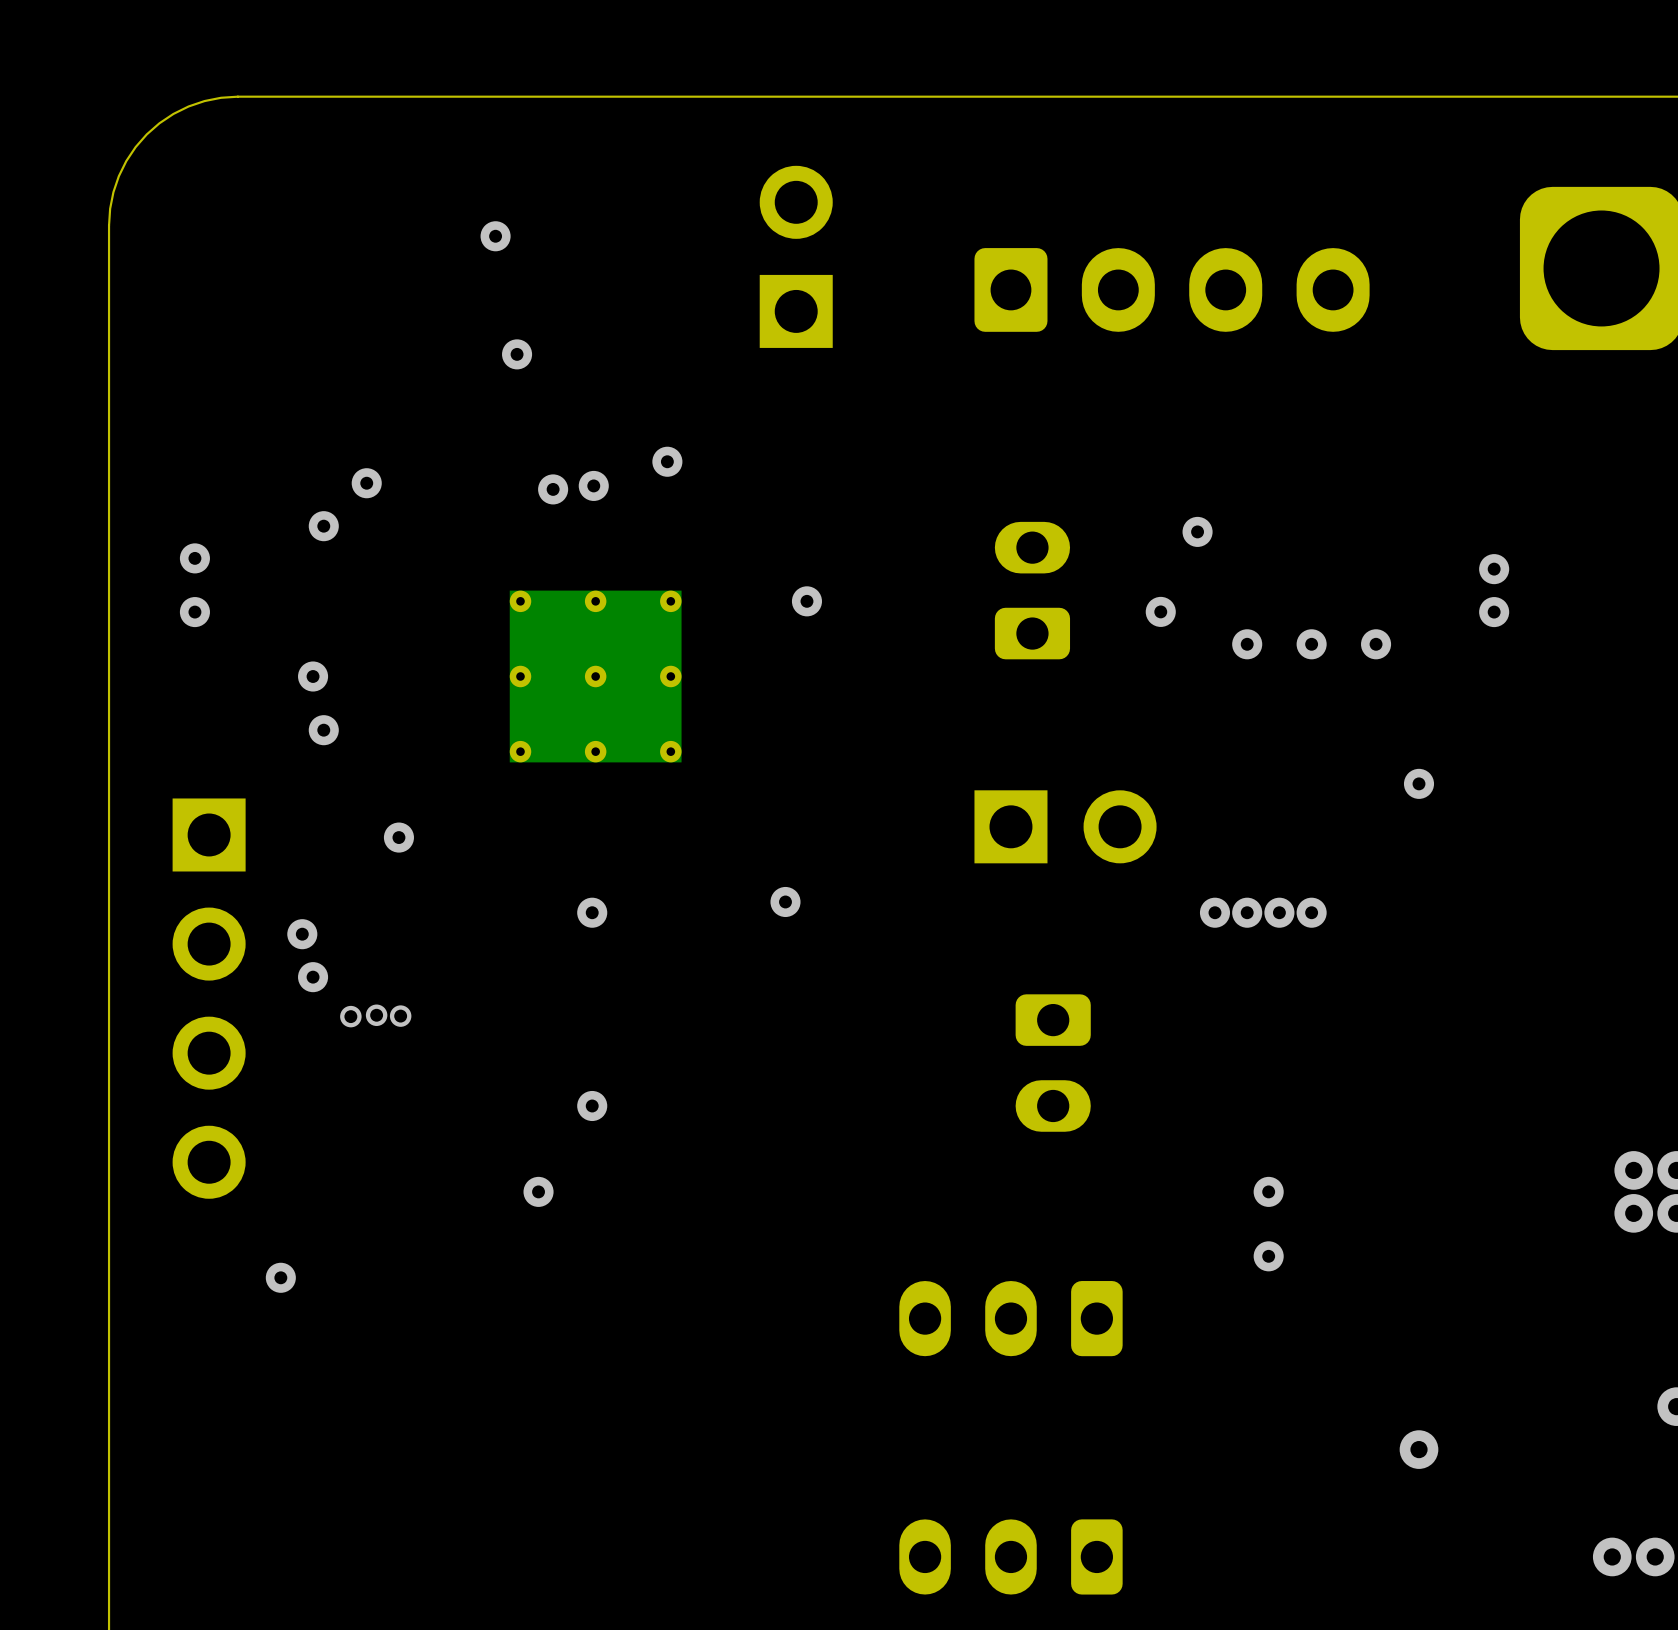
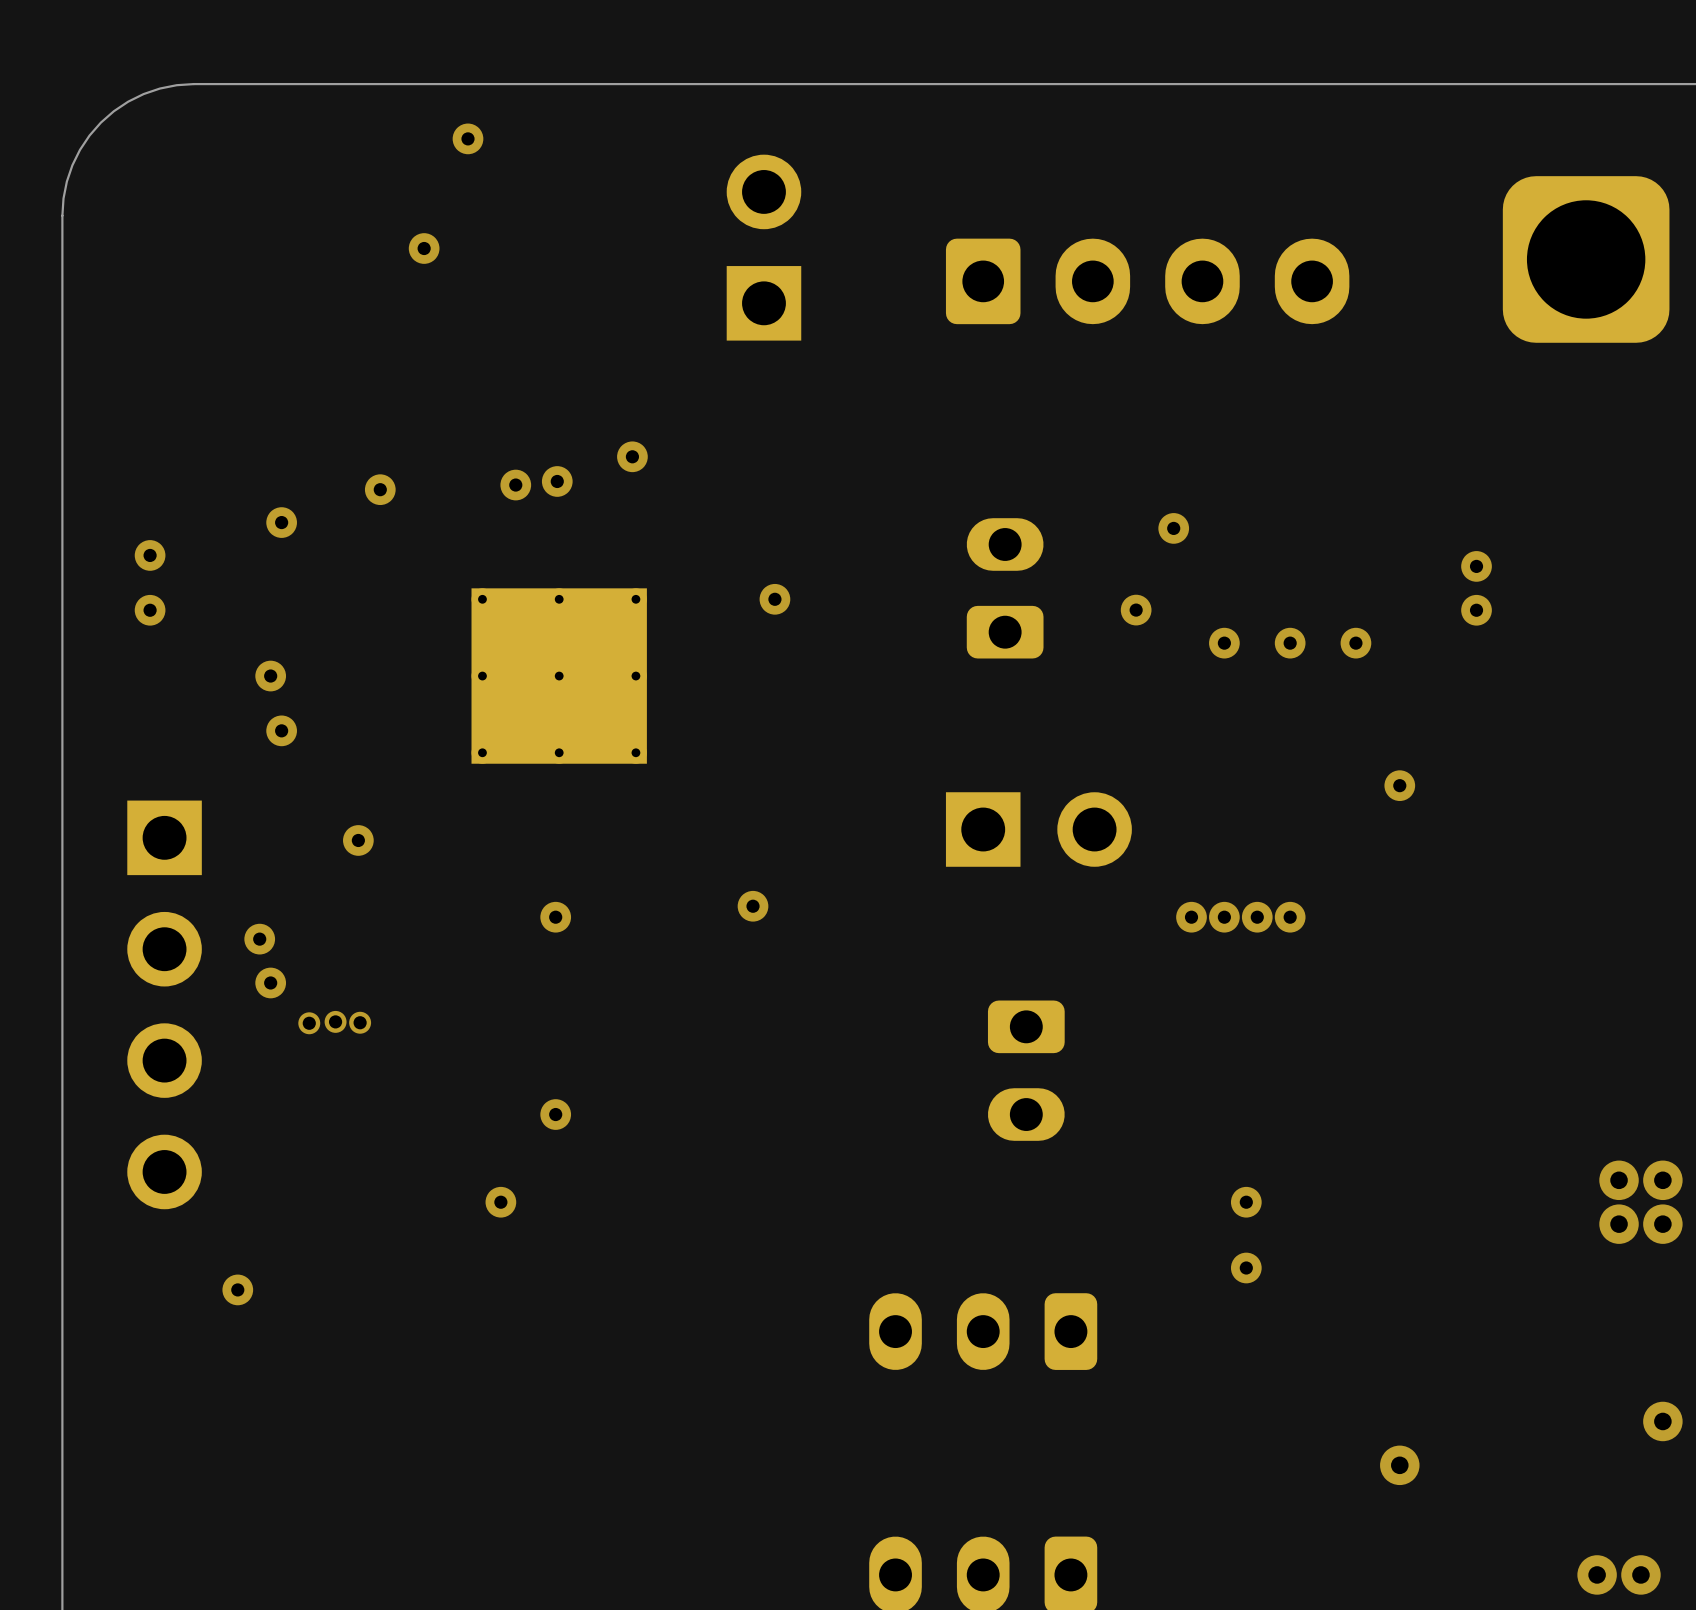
via: none -> (467, 138)
via position: (495, 236) -> (424, 248)
via: (517, 354) -> none
via position: (366, 483) -> (380, 489)

